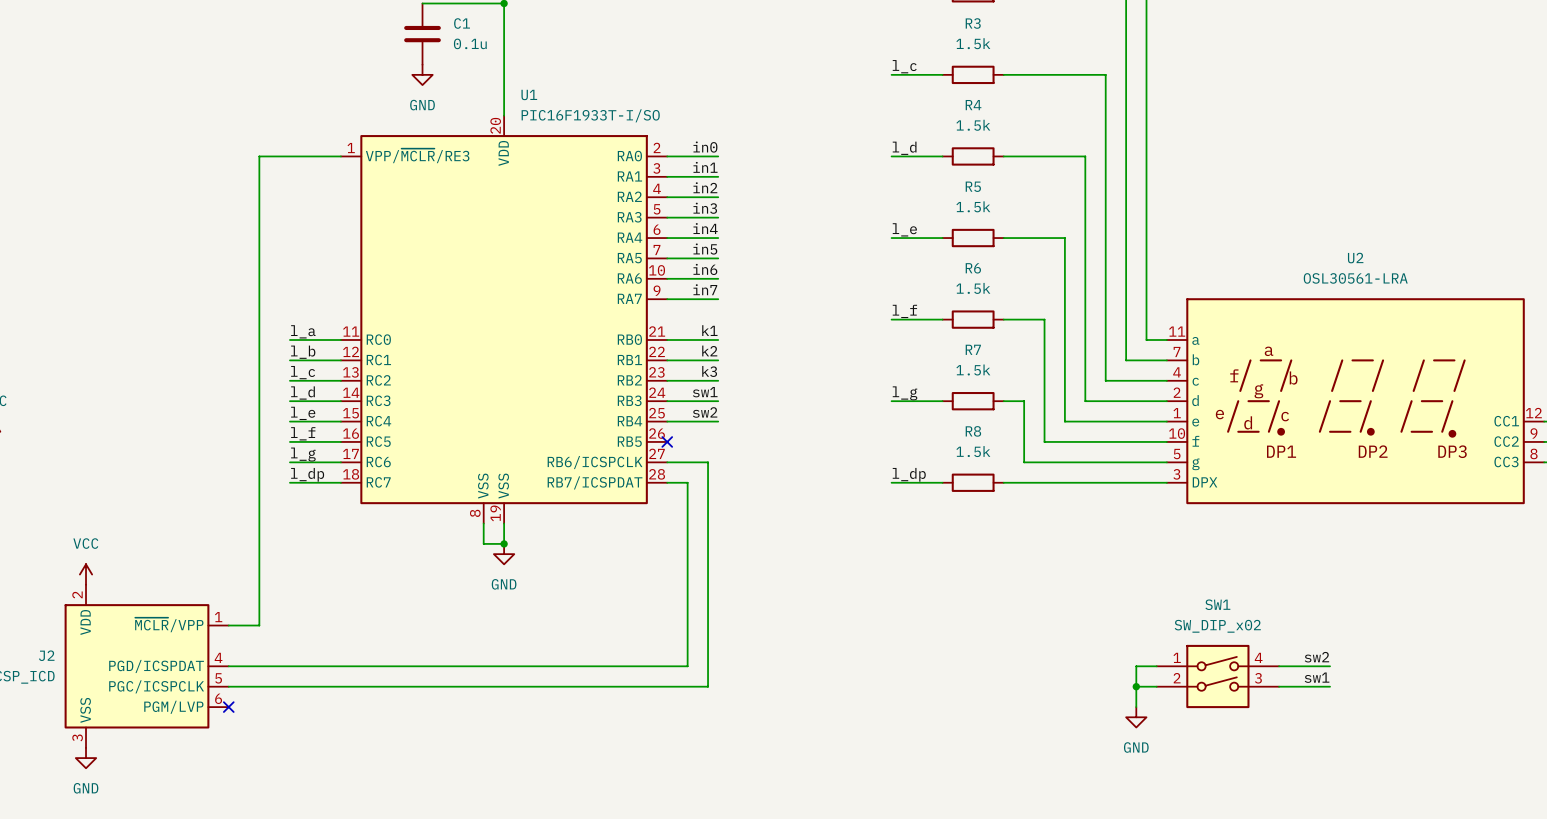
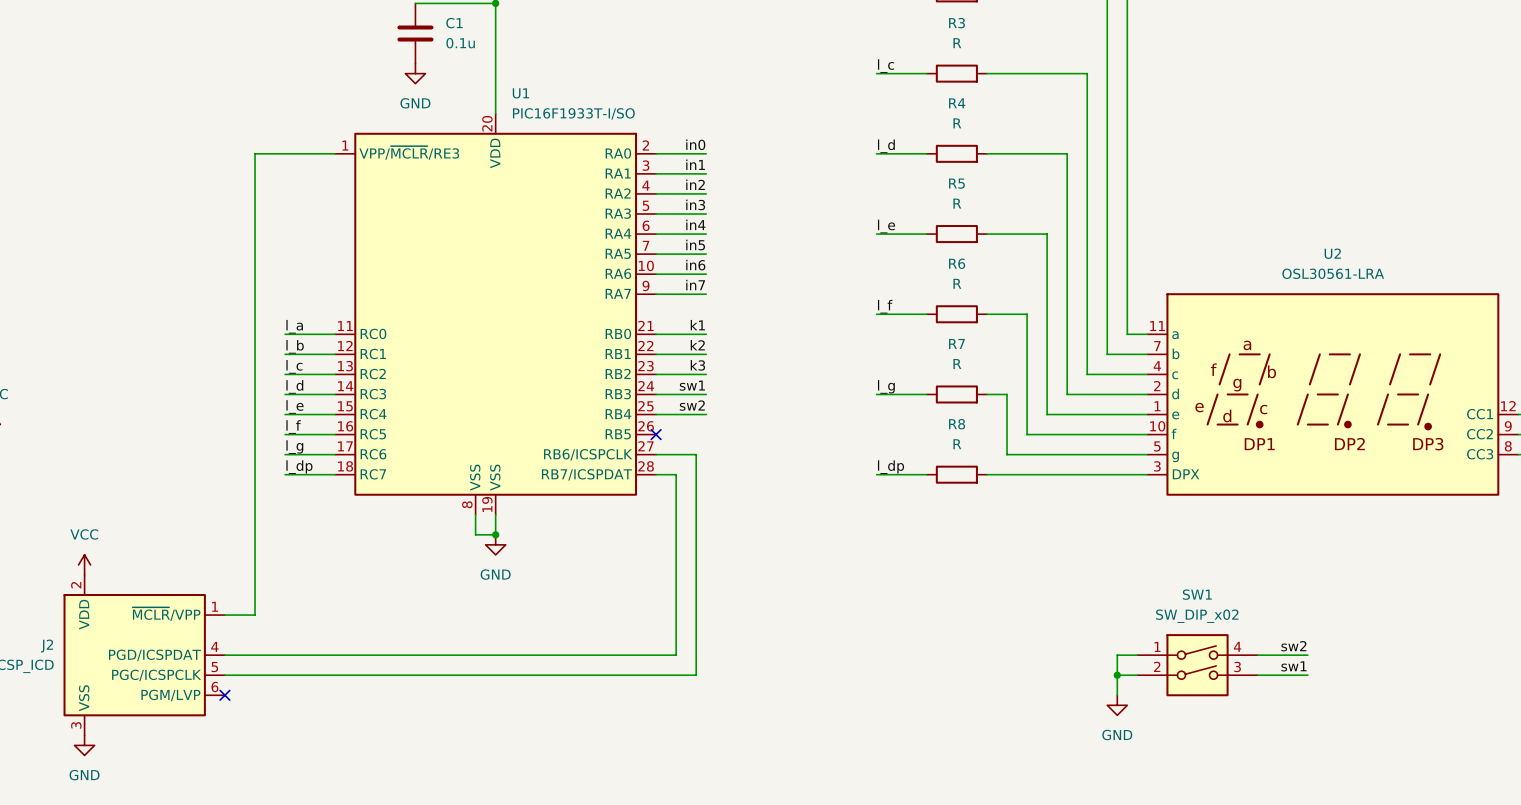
R3 value: 1.5k (973, 43) -> R (957, 43)
R4 value: 1.5k (973, 125) -> R (957, 123)
R5 value: 1.5k (973, 206) -> R (957, 203)
R6 value: 1.5k (973, 288) -> R (957, 283)
R7 value: 1.5k (973, 369) -> R (957, 364)
R8 value: 1.5k (973, 451) -> R (957, 444)

